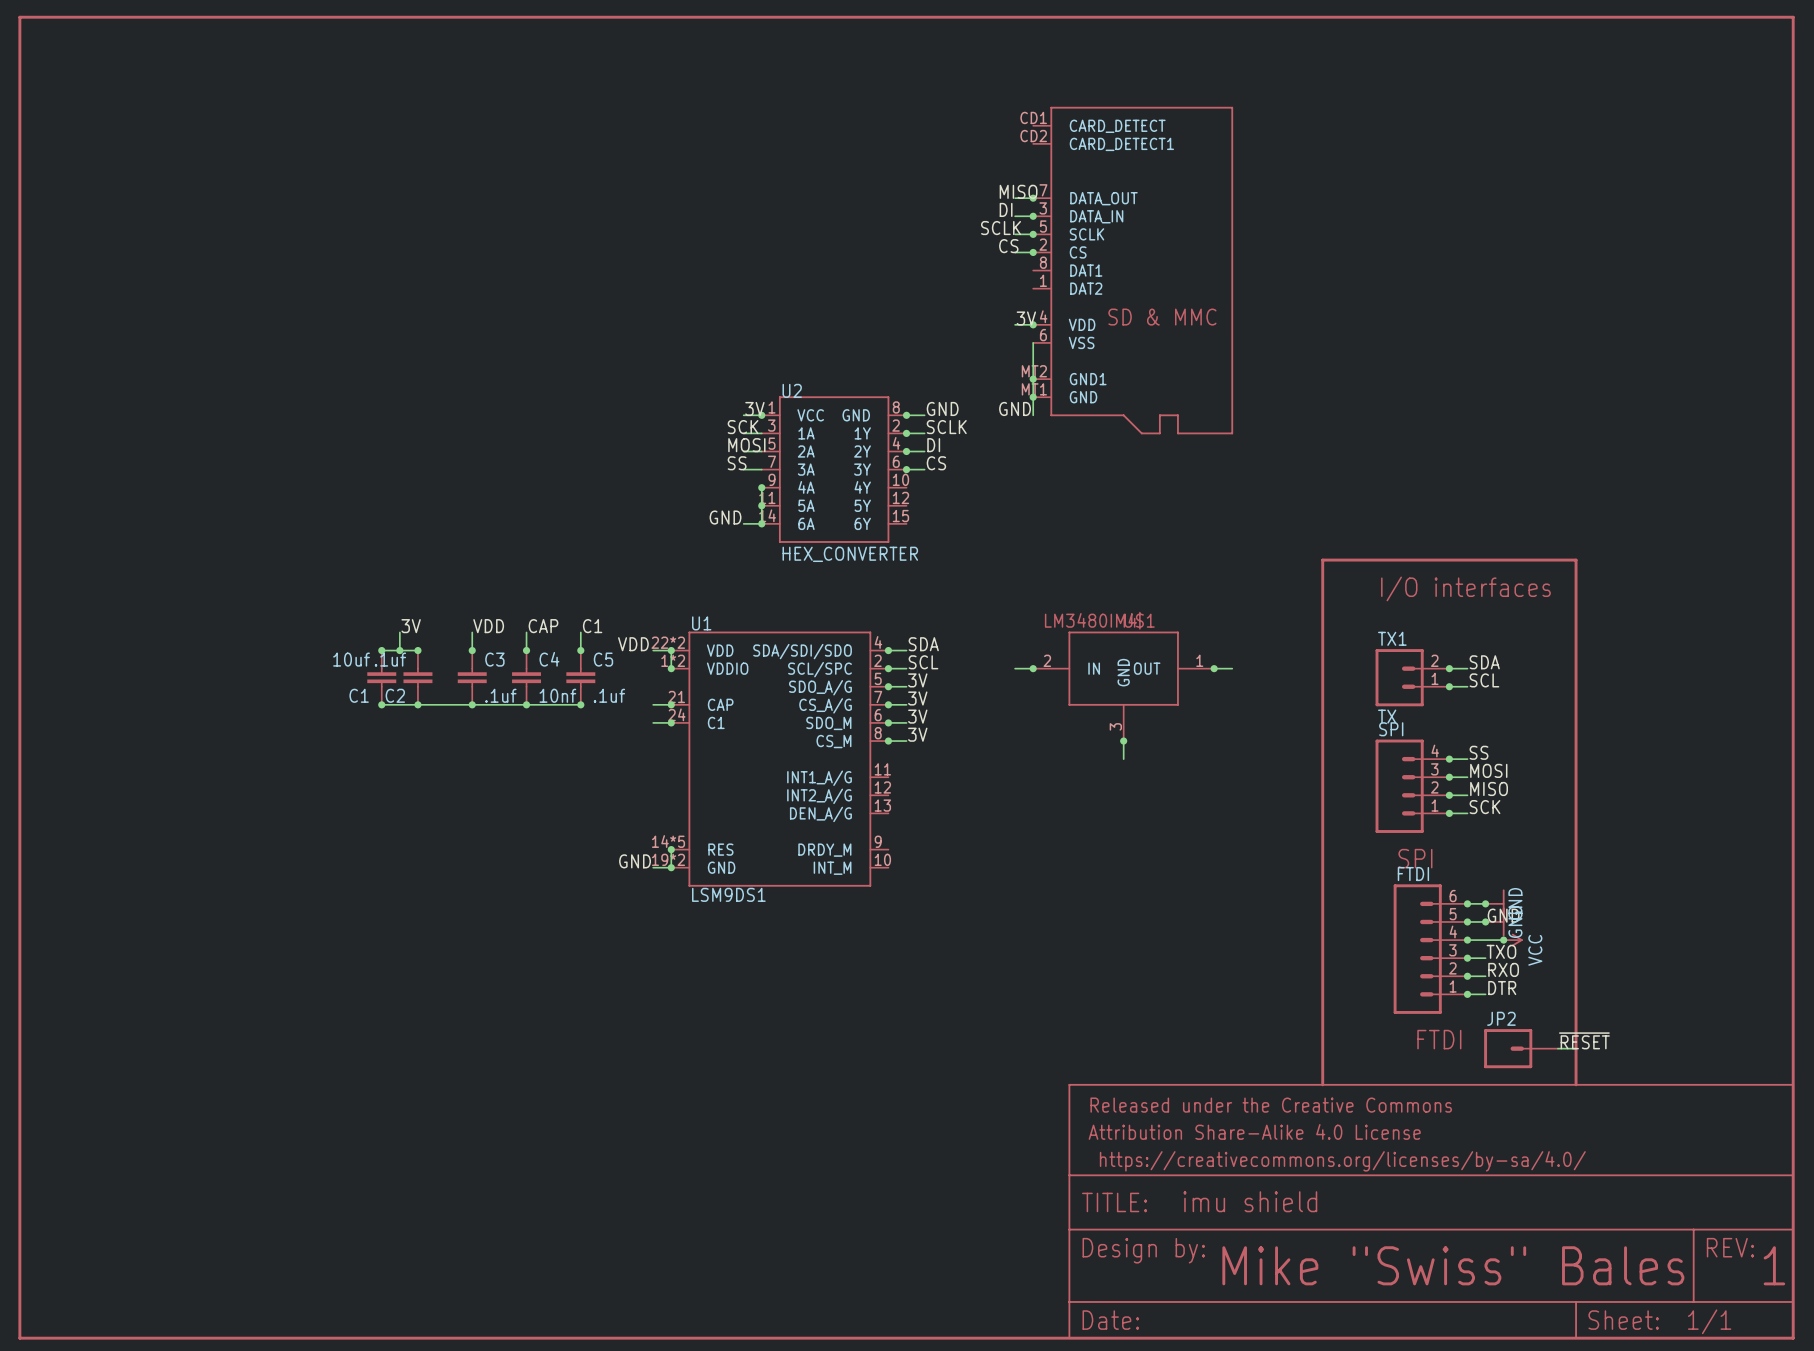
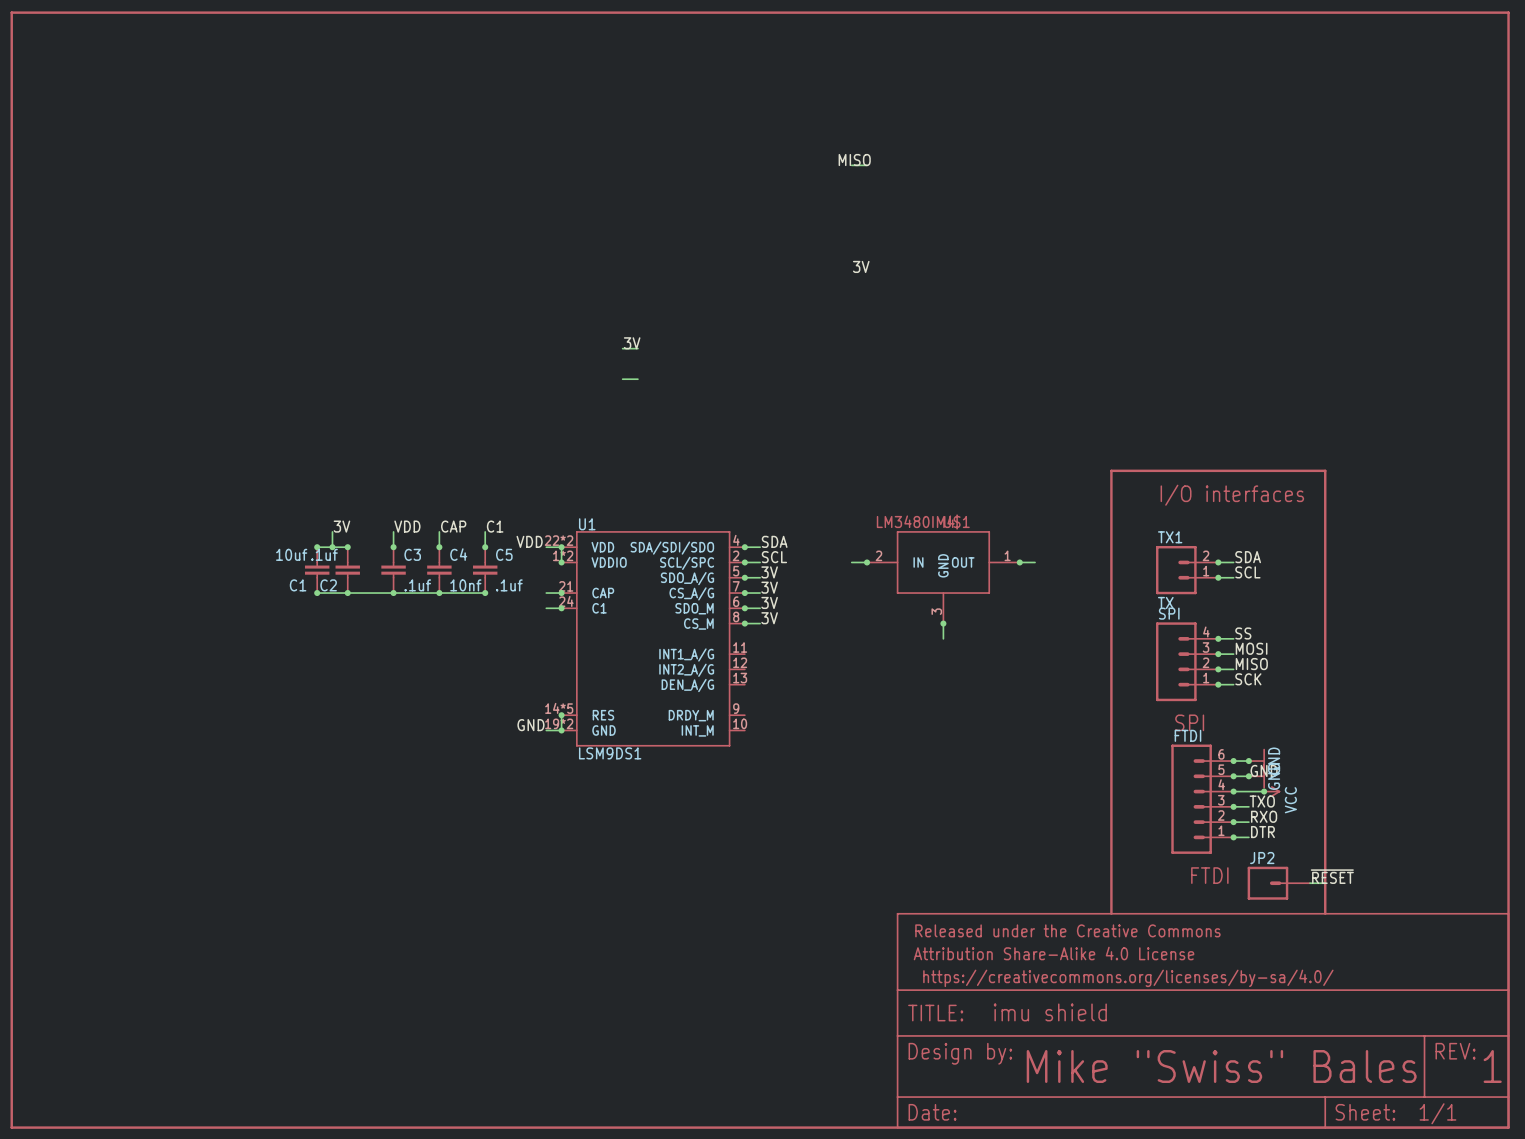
junction: (1033, 198) -> none
label: DI (1006, 209) -> none
wire: (1015, 216) (1033, 216) -> none
junction: (1033, 216) -> none
label: SCLK (1001, 228) -> none
wire: (1015, 234) (1033, 234) -> none
junction: (1033, 234) -> none
label: CS (1008, 246) -> none
wire: (1015, 252) (1033, 252) -> none
junction: (1033, 252) -> none
part: (1133, 270) -> none
wire: (1015, 324) (1033, 324) -> none
junction: (1033, 324) -> none
wire: (1033, 342) (1033, 415) -> none
junction: (1033, 379) -> none
junction: (1033, 397) -> none
label: GND (942, 408) -> none
label: GND (1015, 408) -> none
junction: (761, 415) -> none
wire: (906, 415) (924, 415) -> none
junction: (906, 415) -> none
label: SCK (743, 427) -> none
label: SCLK (946, 427) -> none
wire: (743, 433) (761, 433) -> none
wire: (906, 433) (924, 433) -> none
junction: (906, 433) -> none
label: MOSI (746, 445) -> none
label: DI (933, 445) -> none
wire: (906, 451) (924, 451) -> none
junction: (906, 451) -> none
label: SS (737, 463) -> none
label: CS (936, 463) -> none
wire: (743, 469) (761, 469) -> none
U2: HEX_CONVERTER (834, 469) -> none
wire: (906, 469) (924, 469) -> none
junction: (906, 469) -> none
wire: (761, 487) (761, 523) (743, 523) -> none
junction: (761, 487) -> none
junction: (761, 505) -> none
label: GND (725, 517) -> none
junction: (761, 523) -> none

